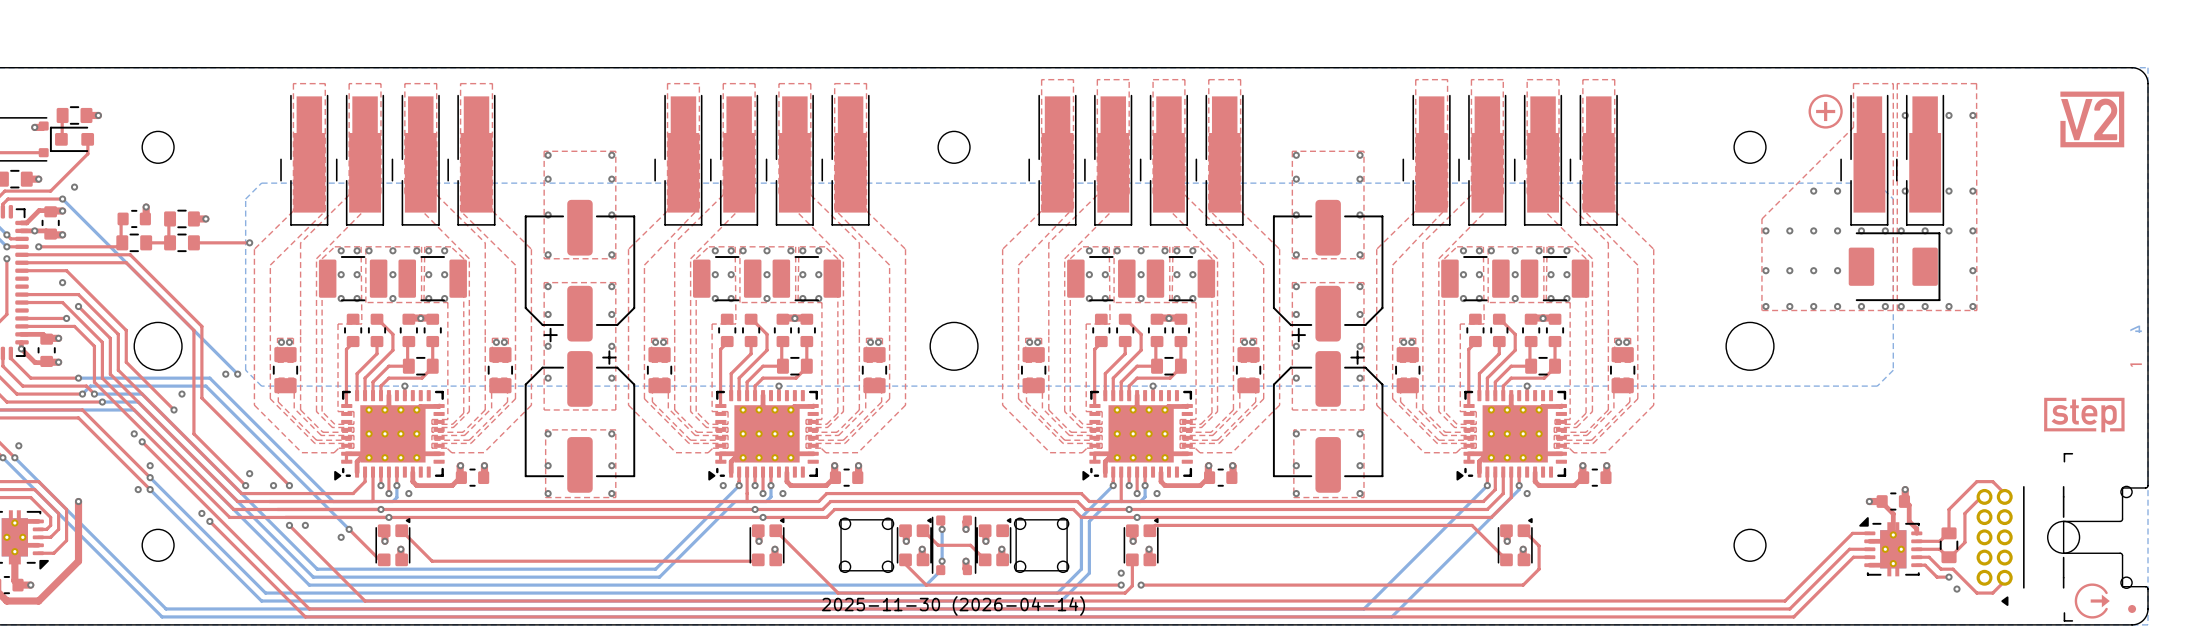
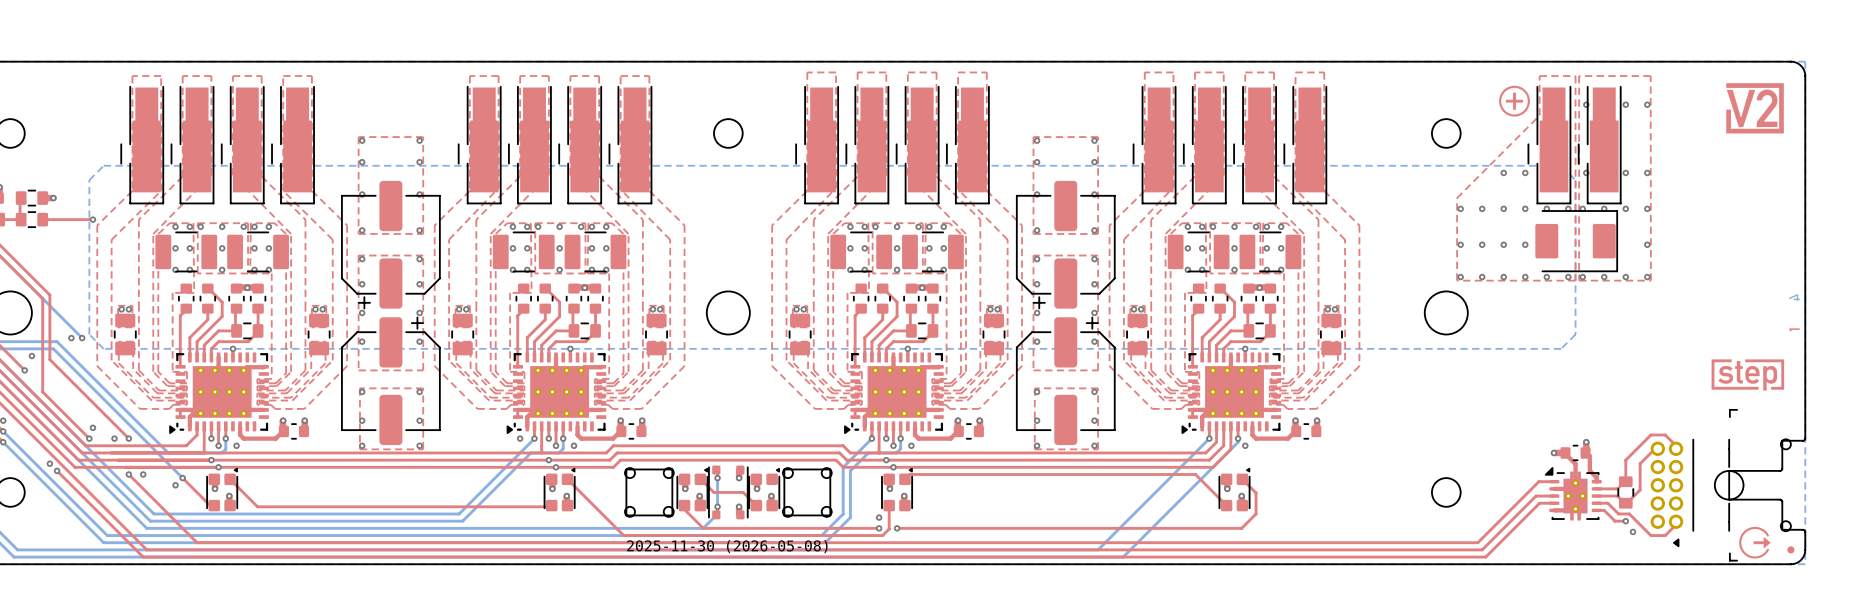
drawing shape: [821, 596, 1086, 616] -> [627, 540, 828, 554]

